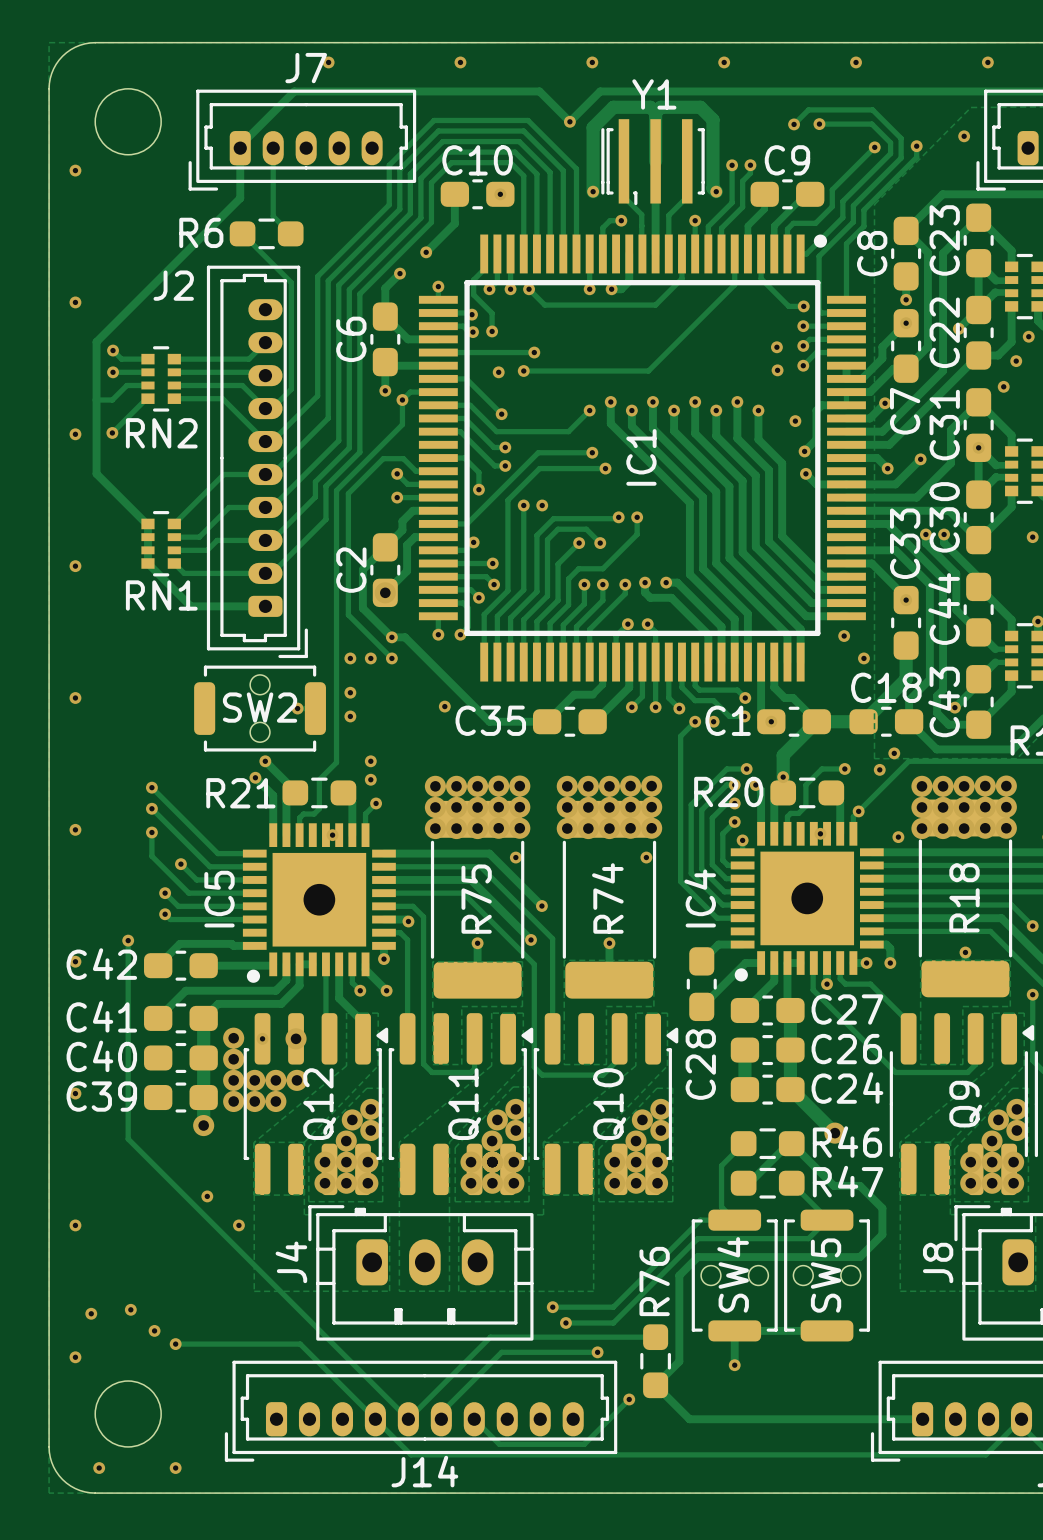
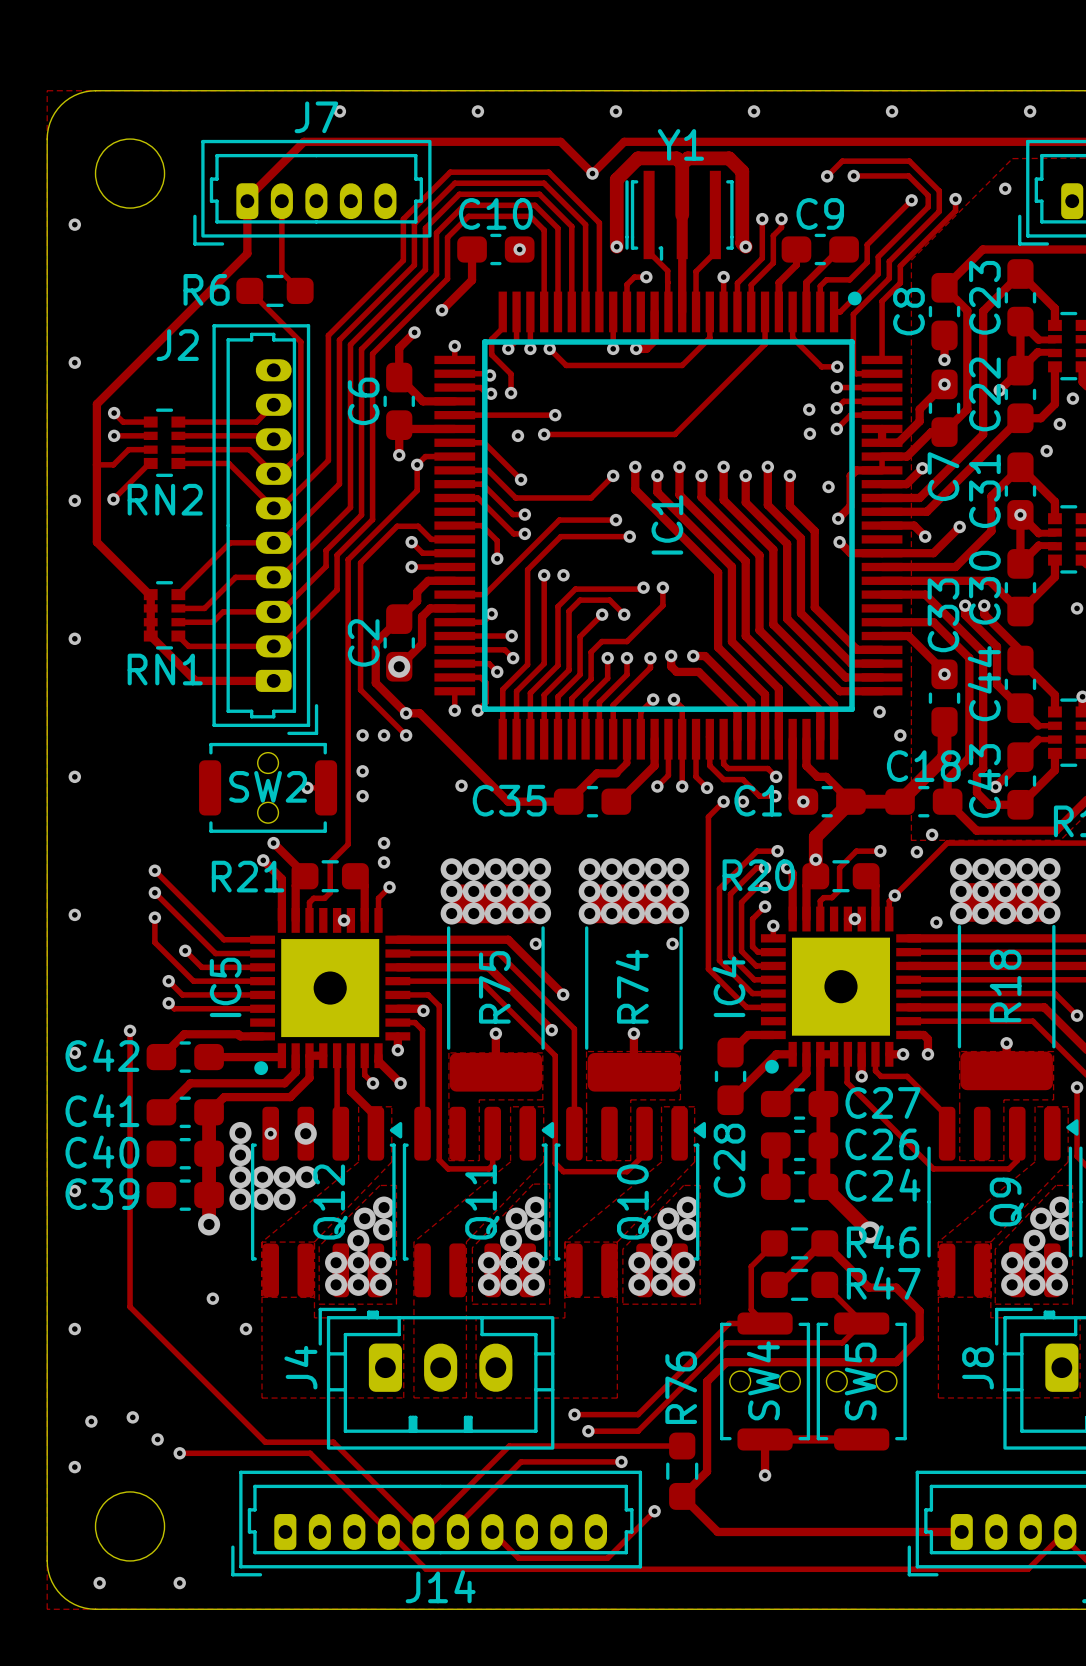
track: (128, 1139) (408, 1419) -> (130, 1238) (130, 1306) (265, 1442) (333, 1442) (423, 1531)

